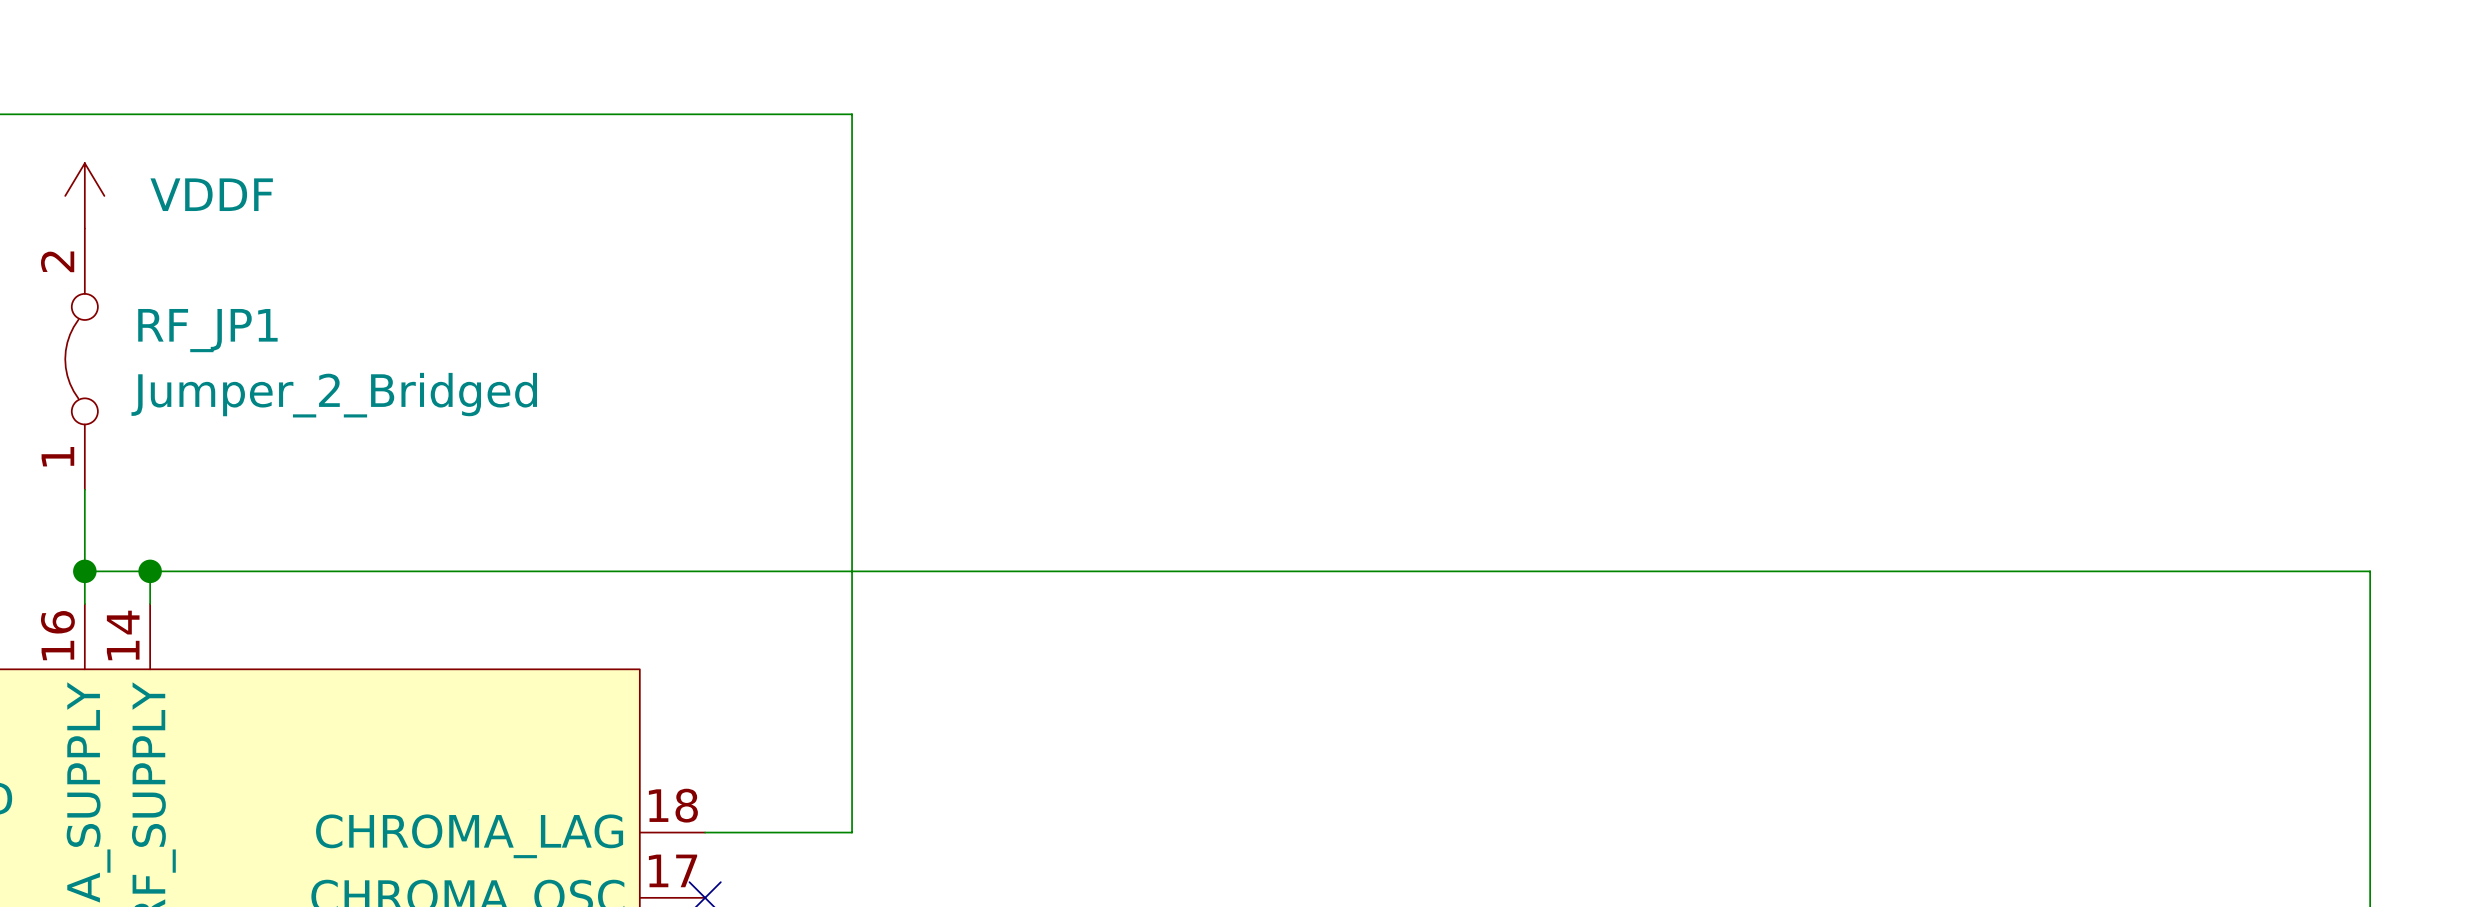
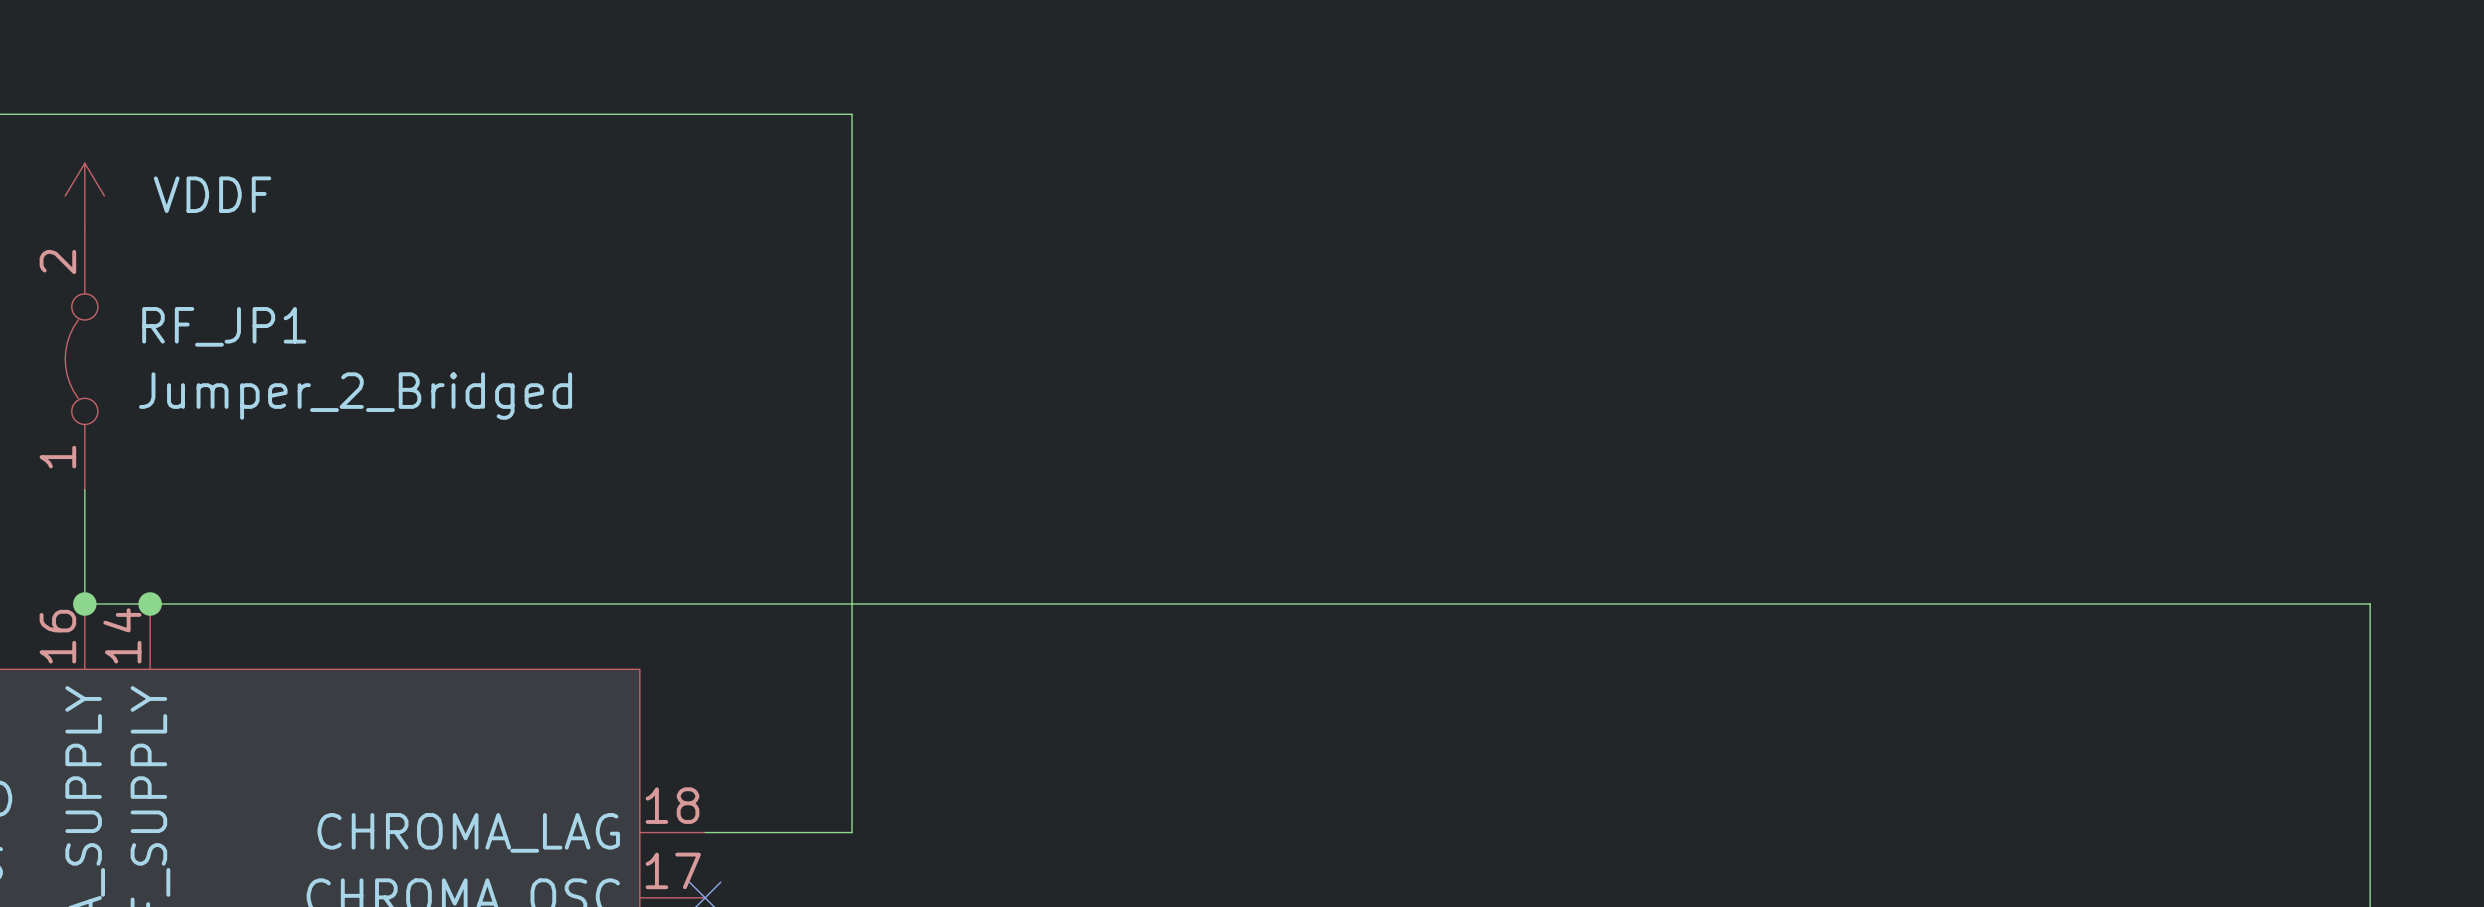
wire: (84, 571) (2370, 571) (2370, 604) -> (84, 604) (2370, 604)
junction position: (84, 571) -> (84, 604)
wire: (150, 571) (150, 604) -> none
junction position: (150, 571) -> (150, 604)

